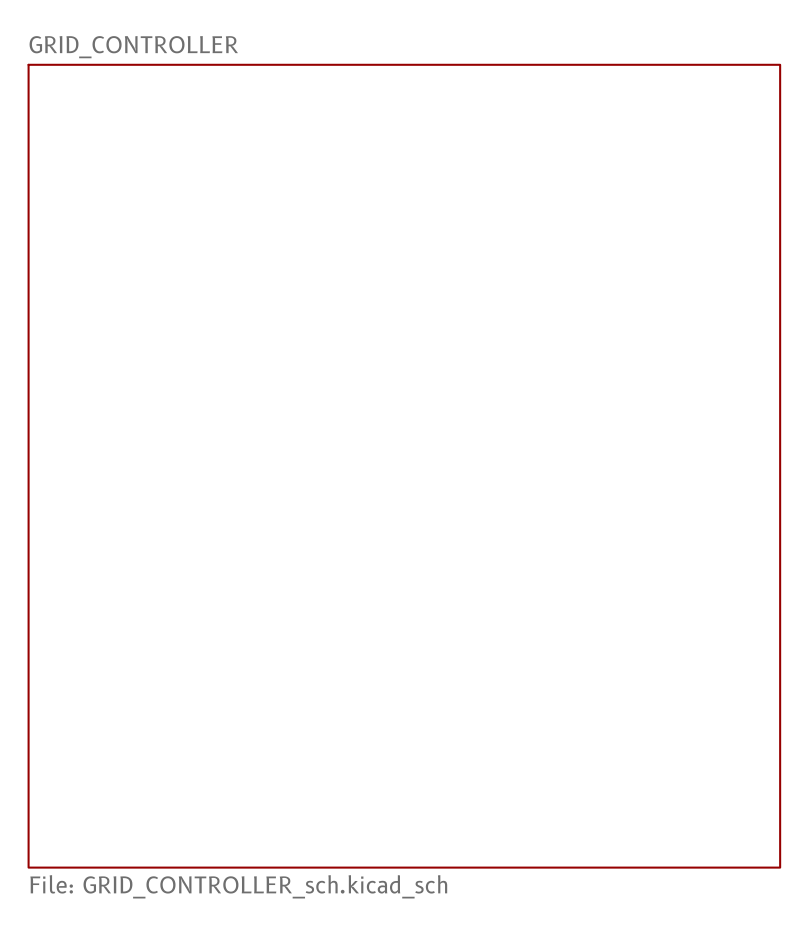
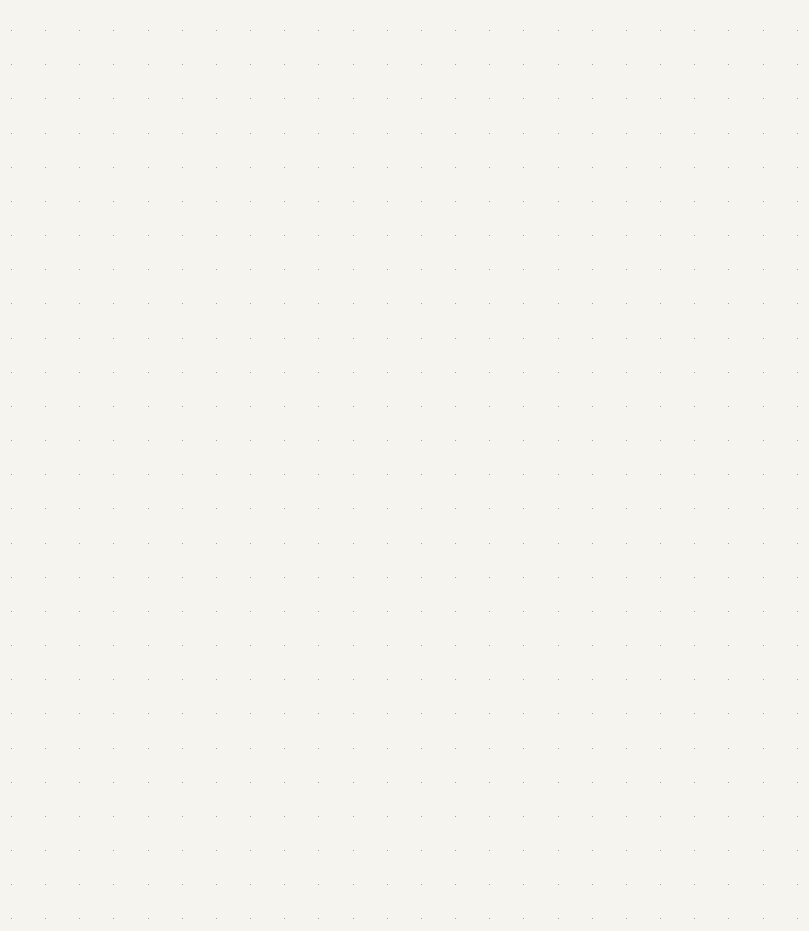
sheet GRID_CONTROLLER: File: GRID_CONTROLLER_sch.kicad_sch (404, 466) -> none

